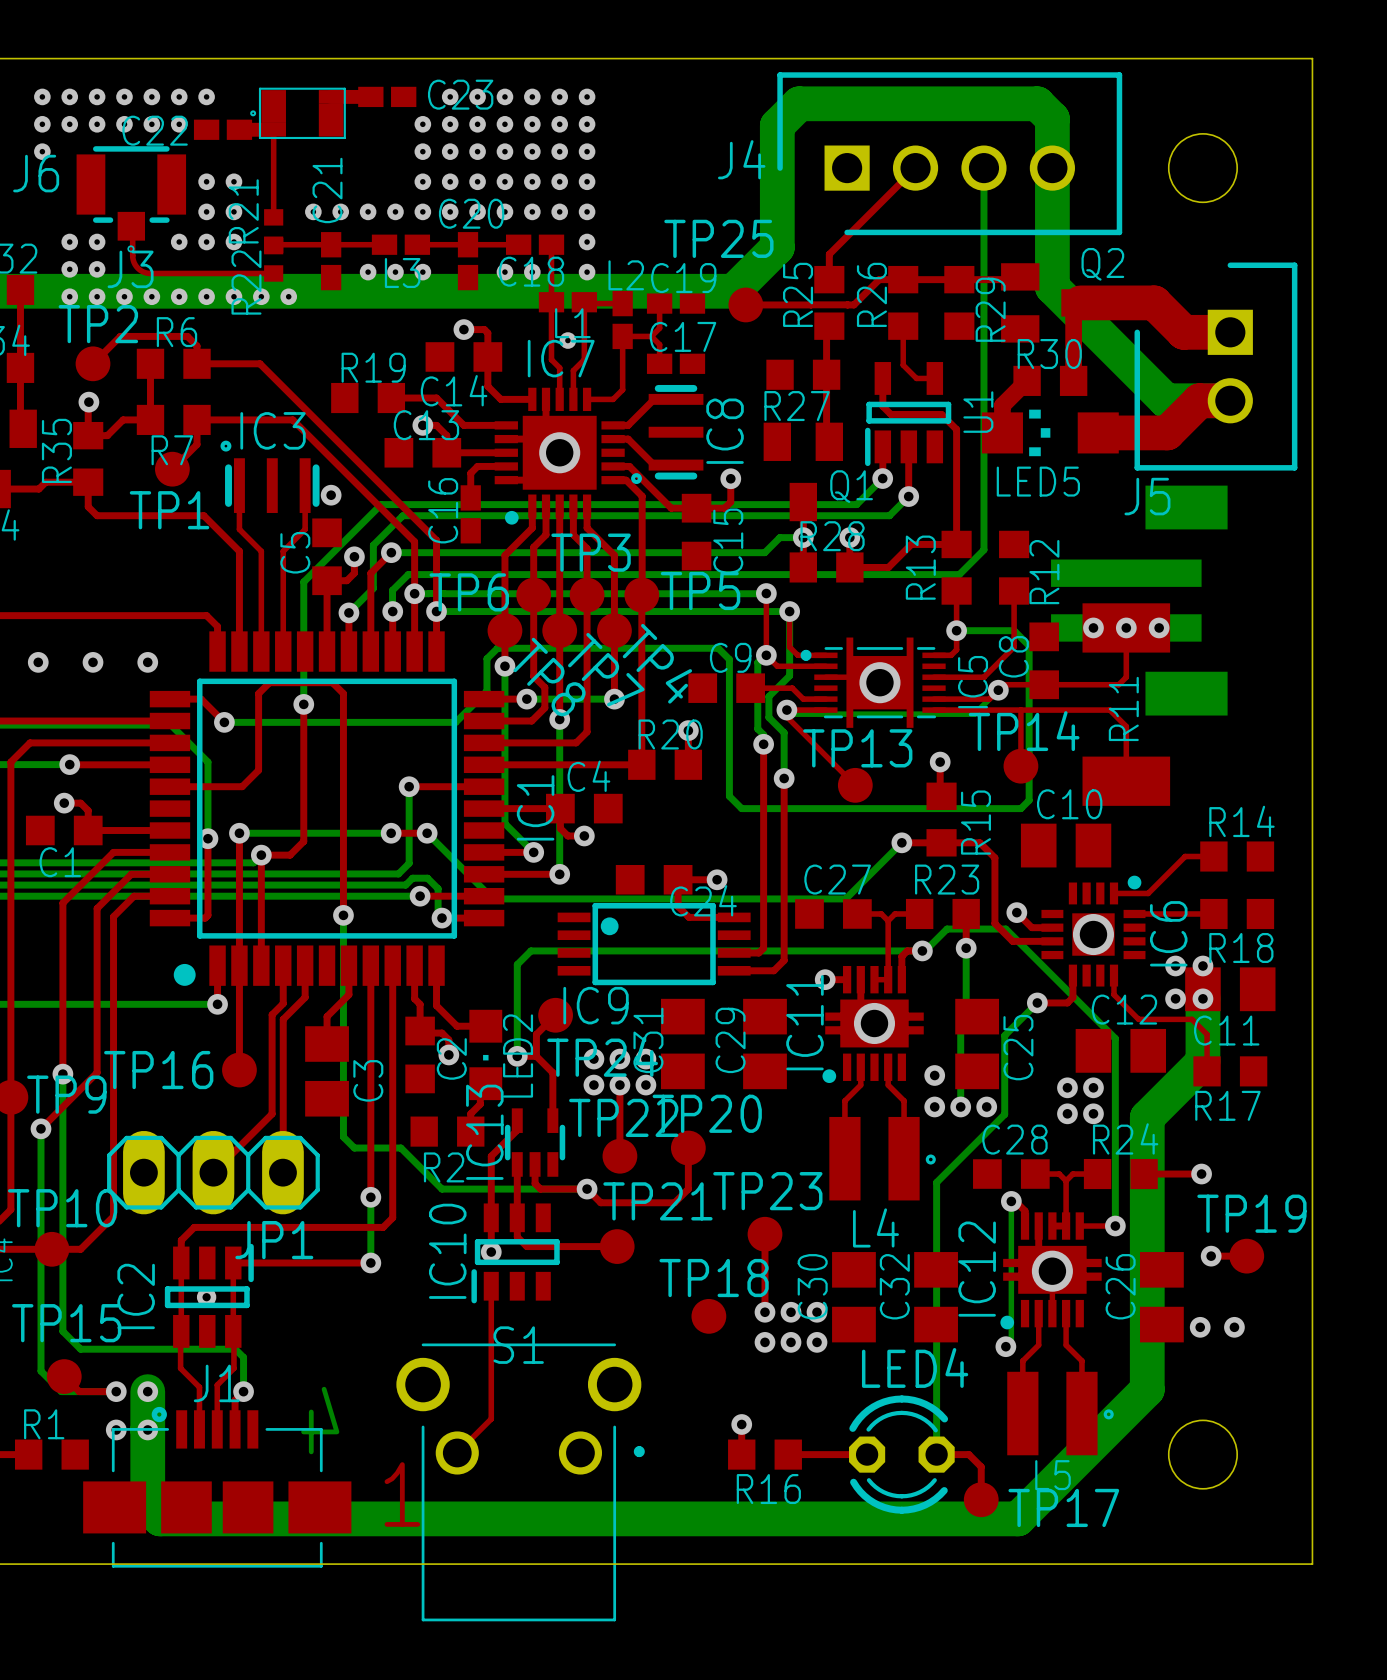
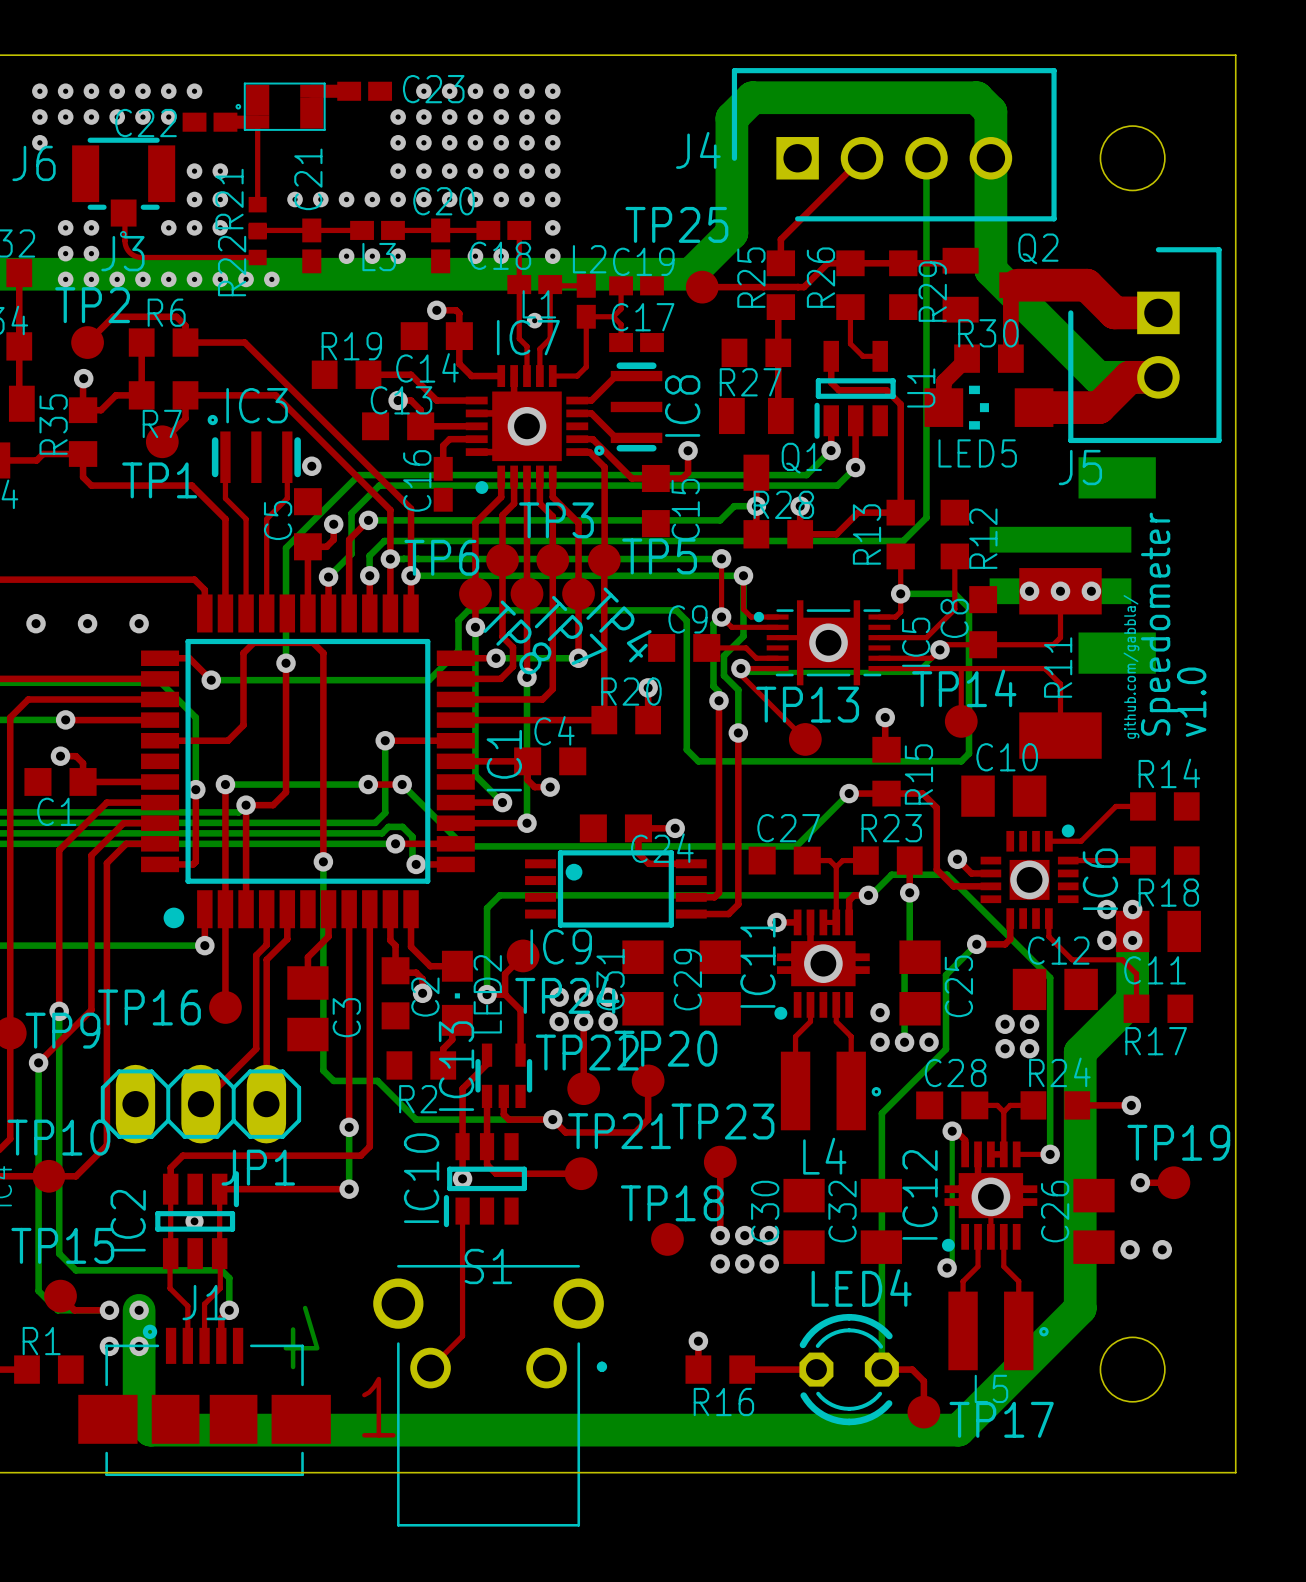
text: none -> Speedometer (1160, 624)
text: none -> github.com/gabbla/ (1131, 666)
text: none -> v1.0 (1191, 702)

